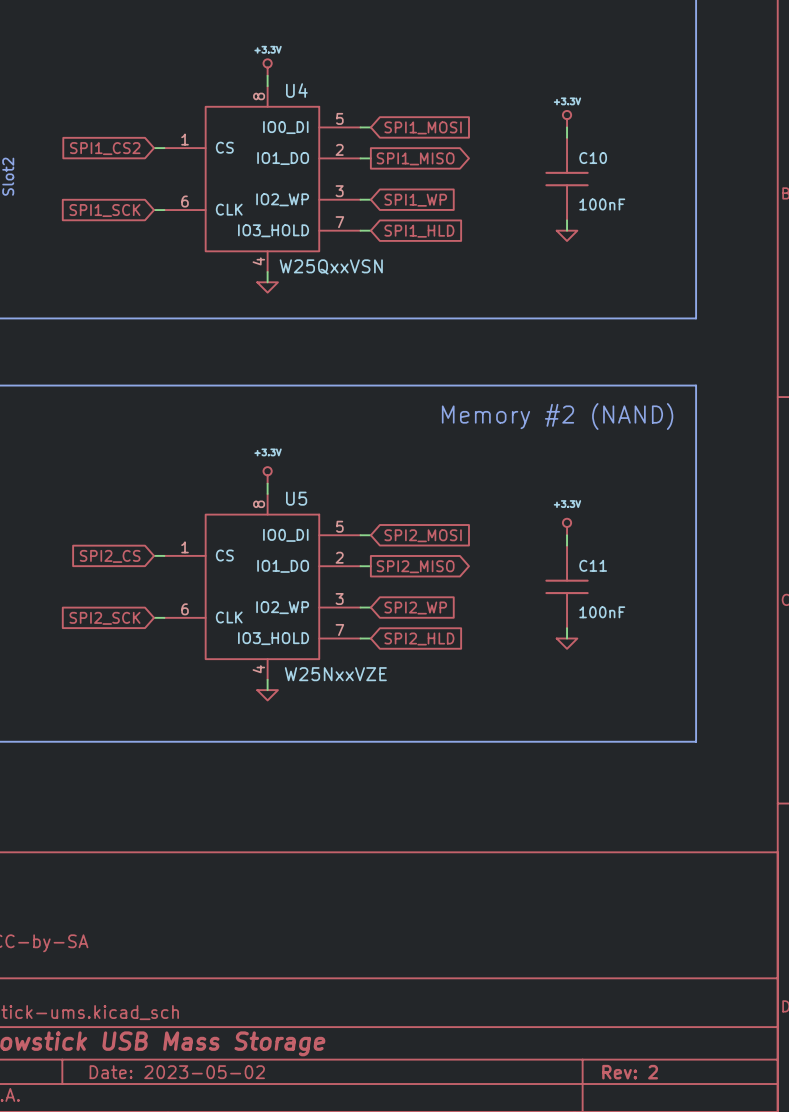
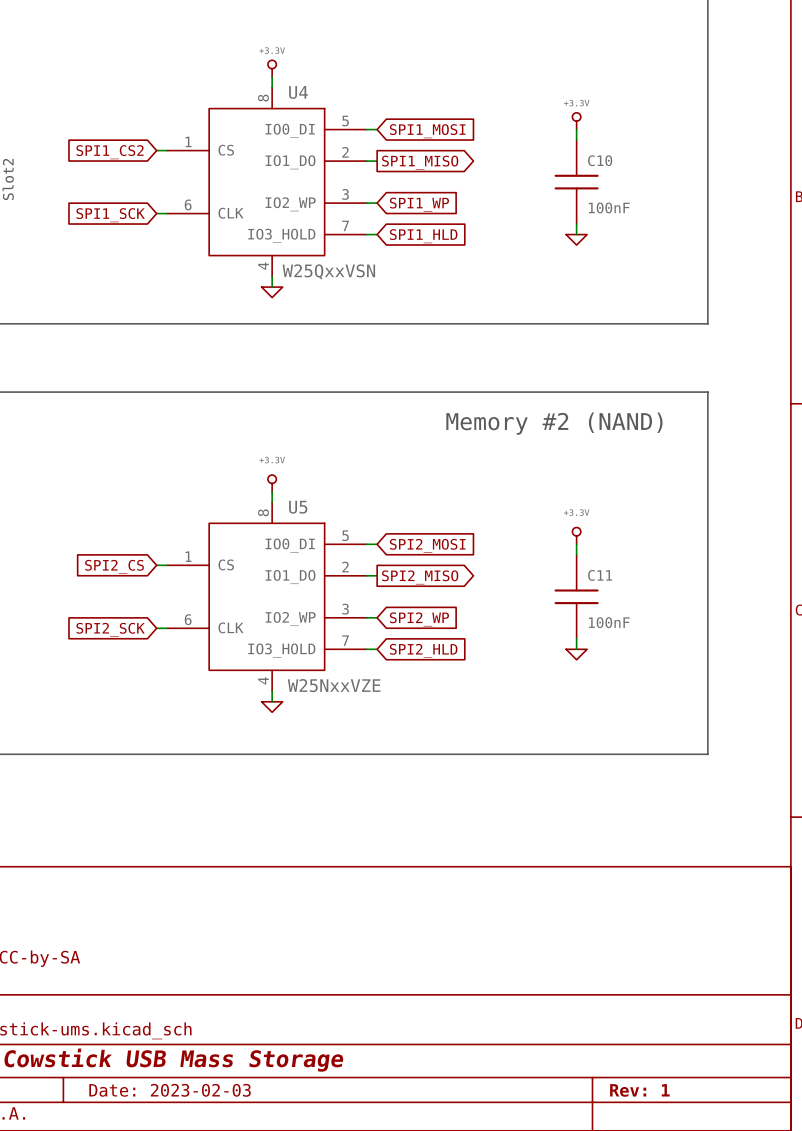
title block: Date: 2023-05-02 (177, 1072) -> Date: 2023-02-03 (170, 1090)
title block: Rev: 2 (630, 1072) -> Rev: 1 (639, 1090)

